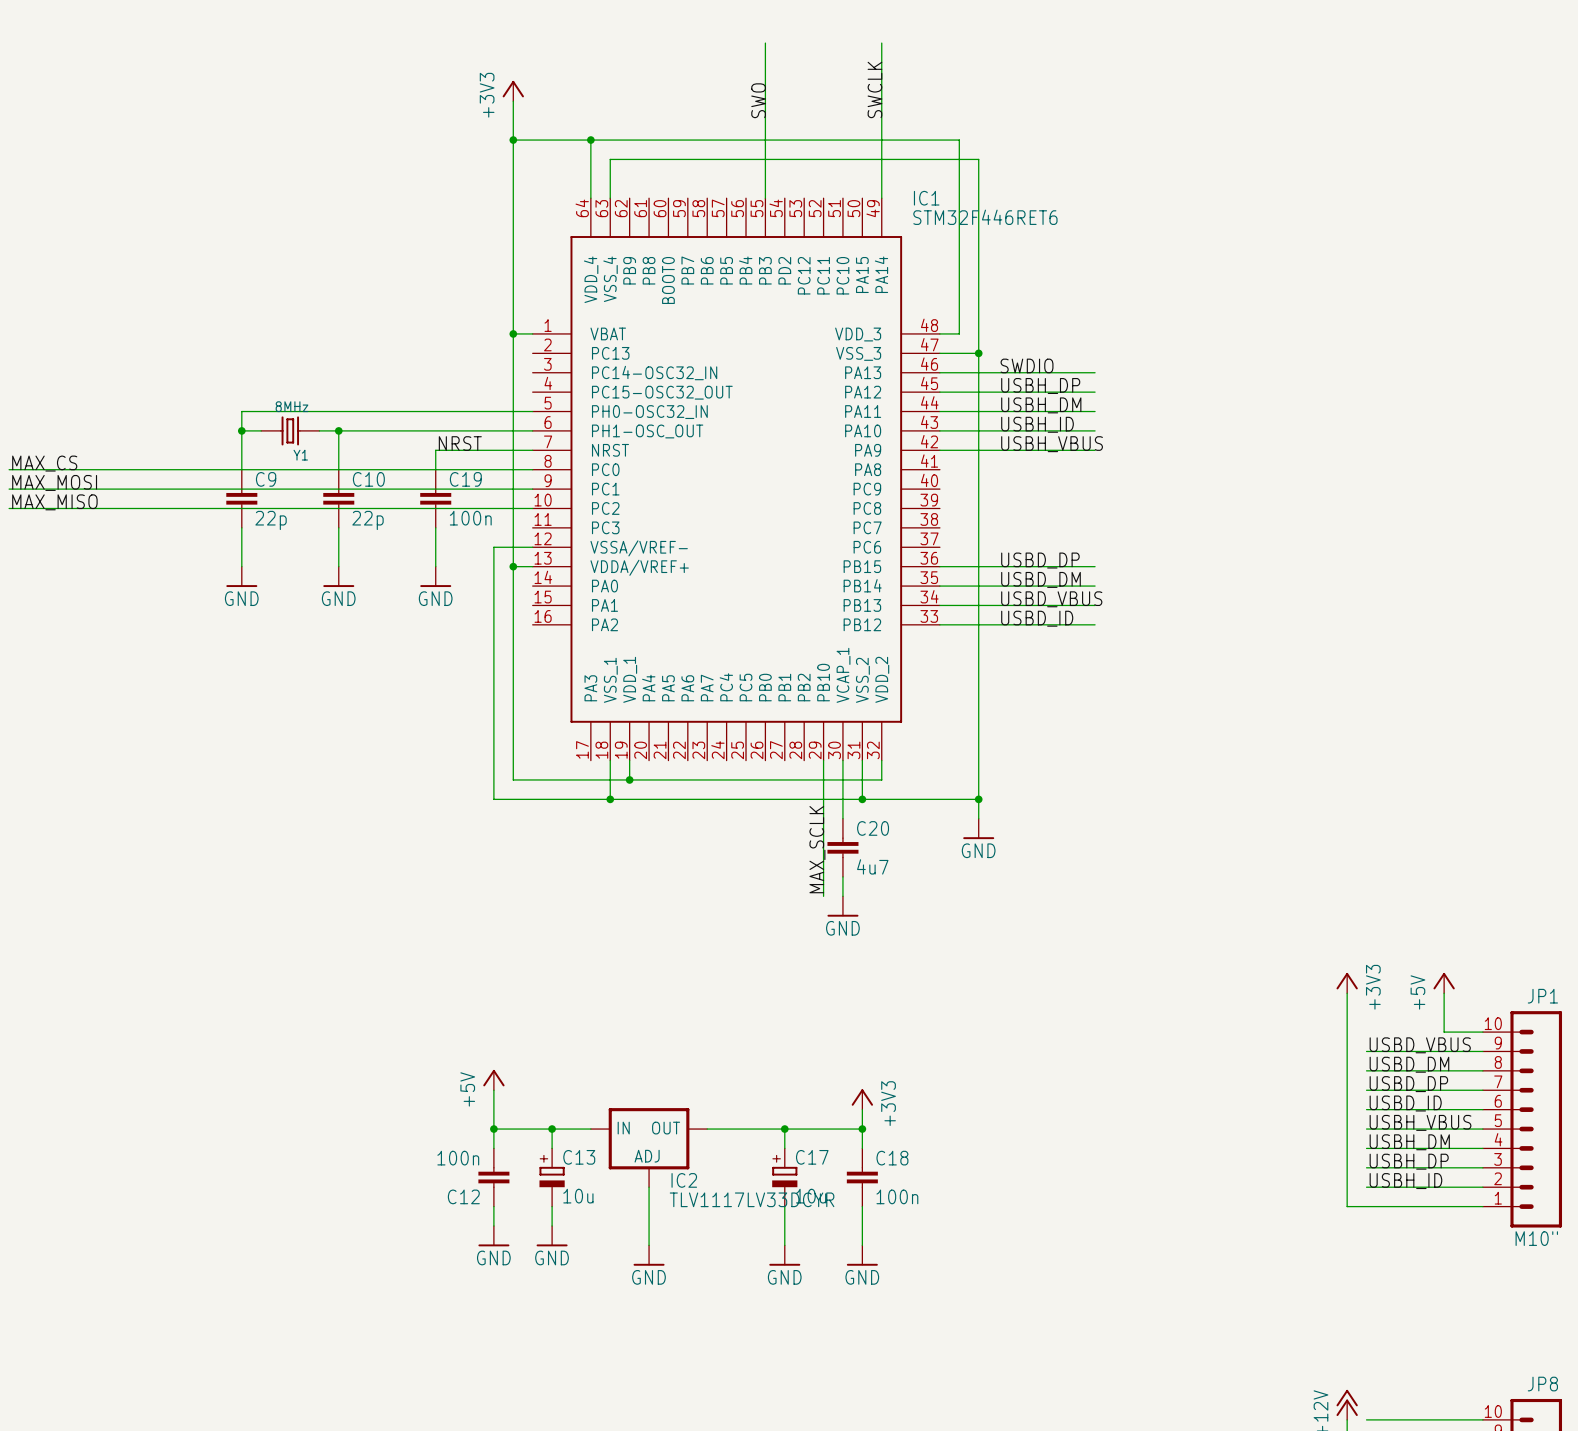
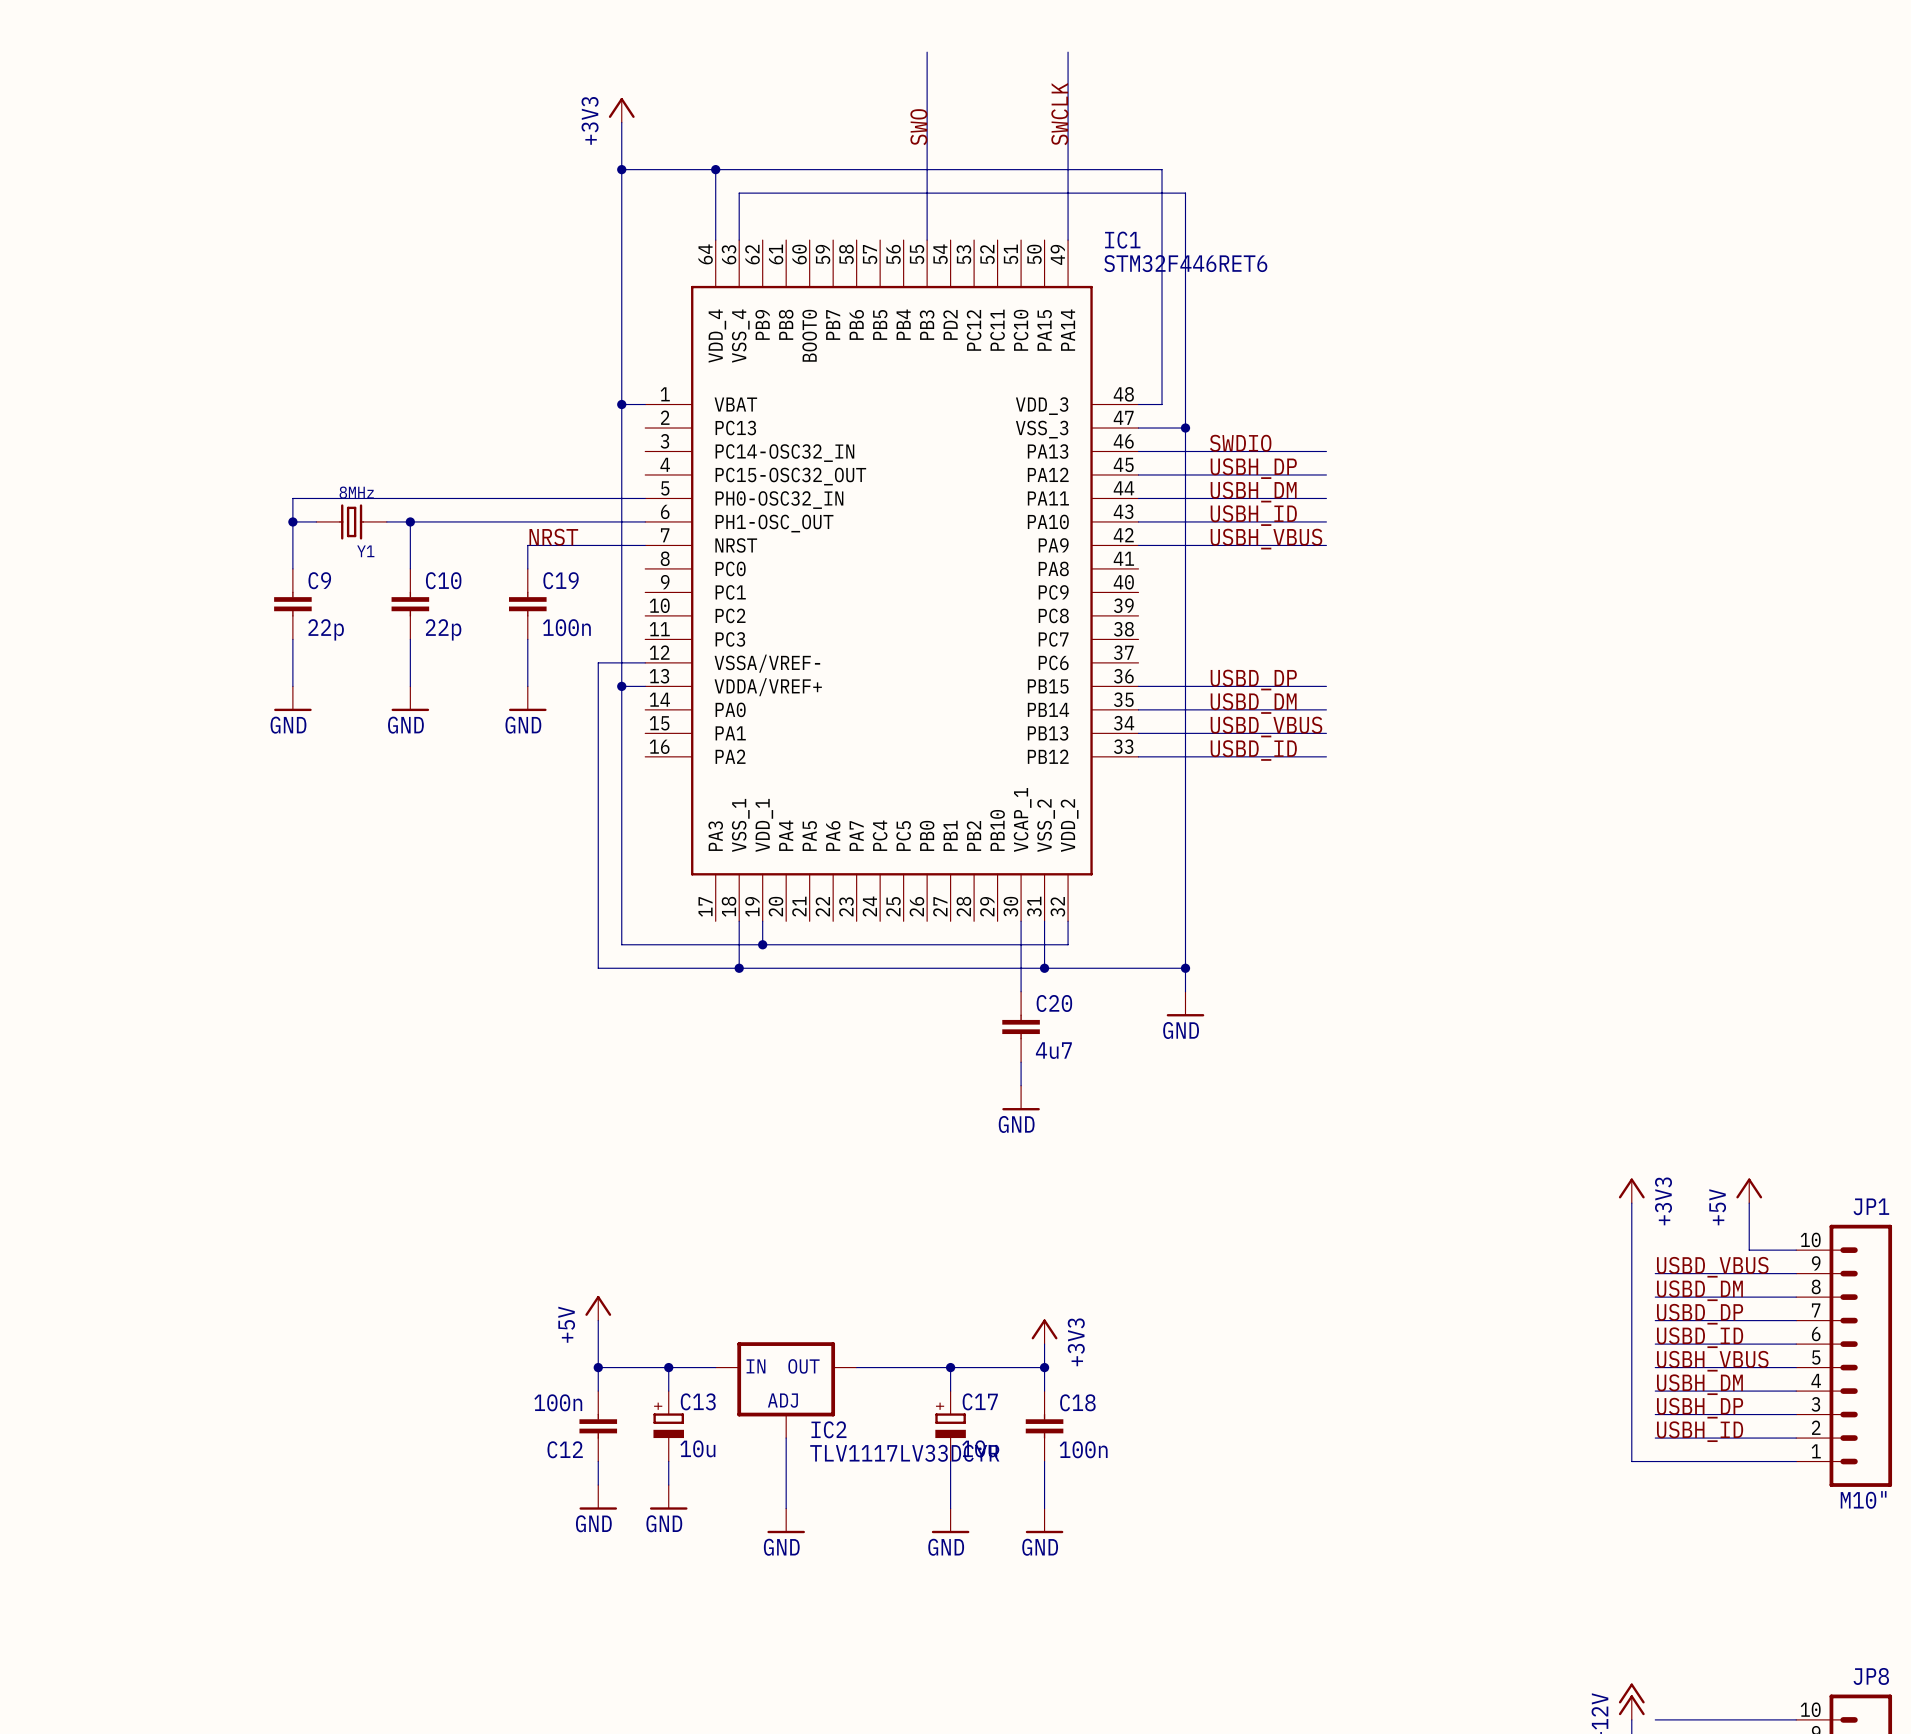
label: MAX_CS (44, 463) -> none
wire: (9, 469) (532, 469) -> none
label: MAX_MOSI (54, 482) -> none
wire: (9, 489) (532, 489) -> none
label: MAX_MISO (54, 502) -> none
wire: (9, 508) (532, 508) -> none
wire: (823, 760) (823, 896) -> none
label: MAX_SCLK (817, 849) -> none

